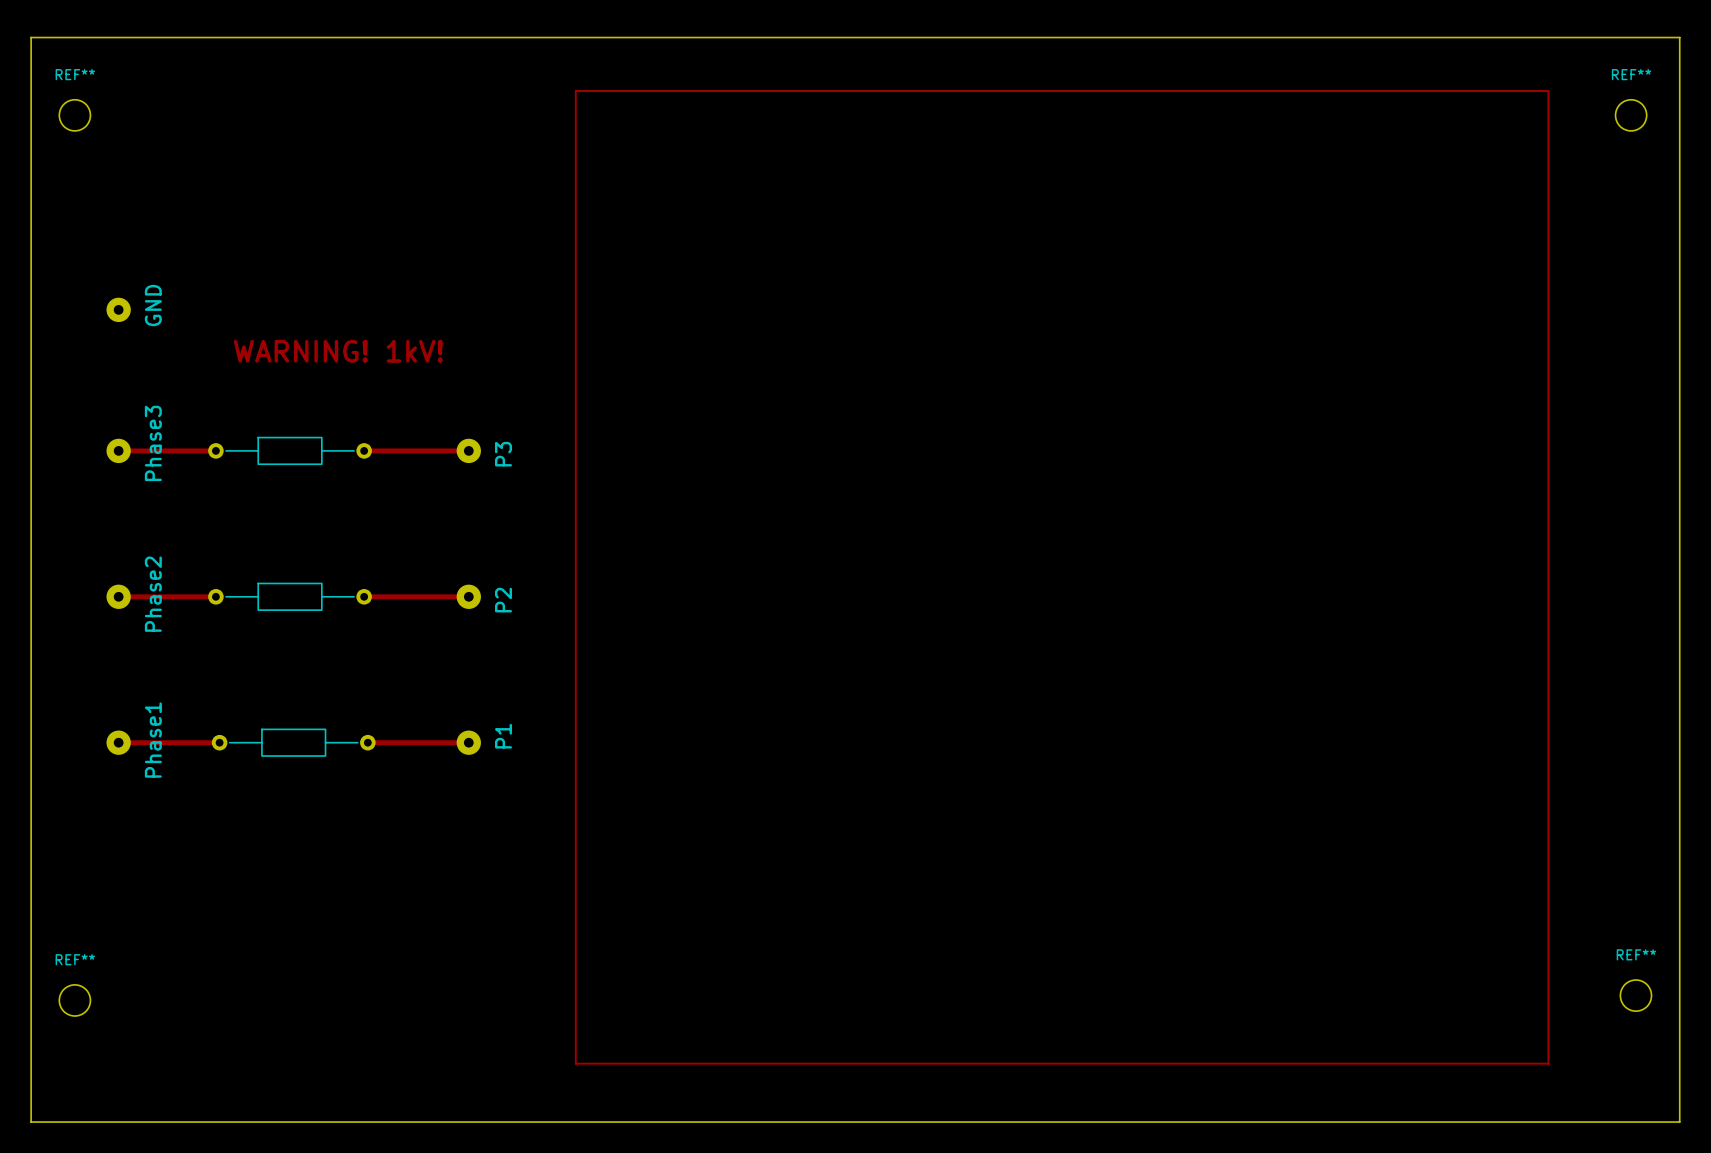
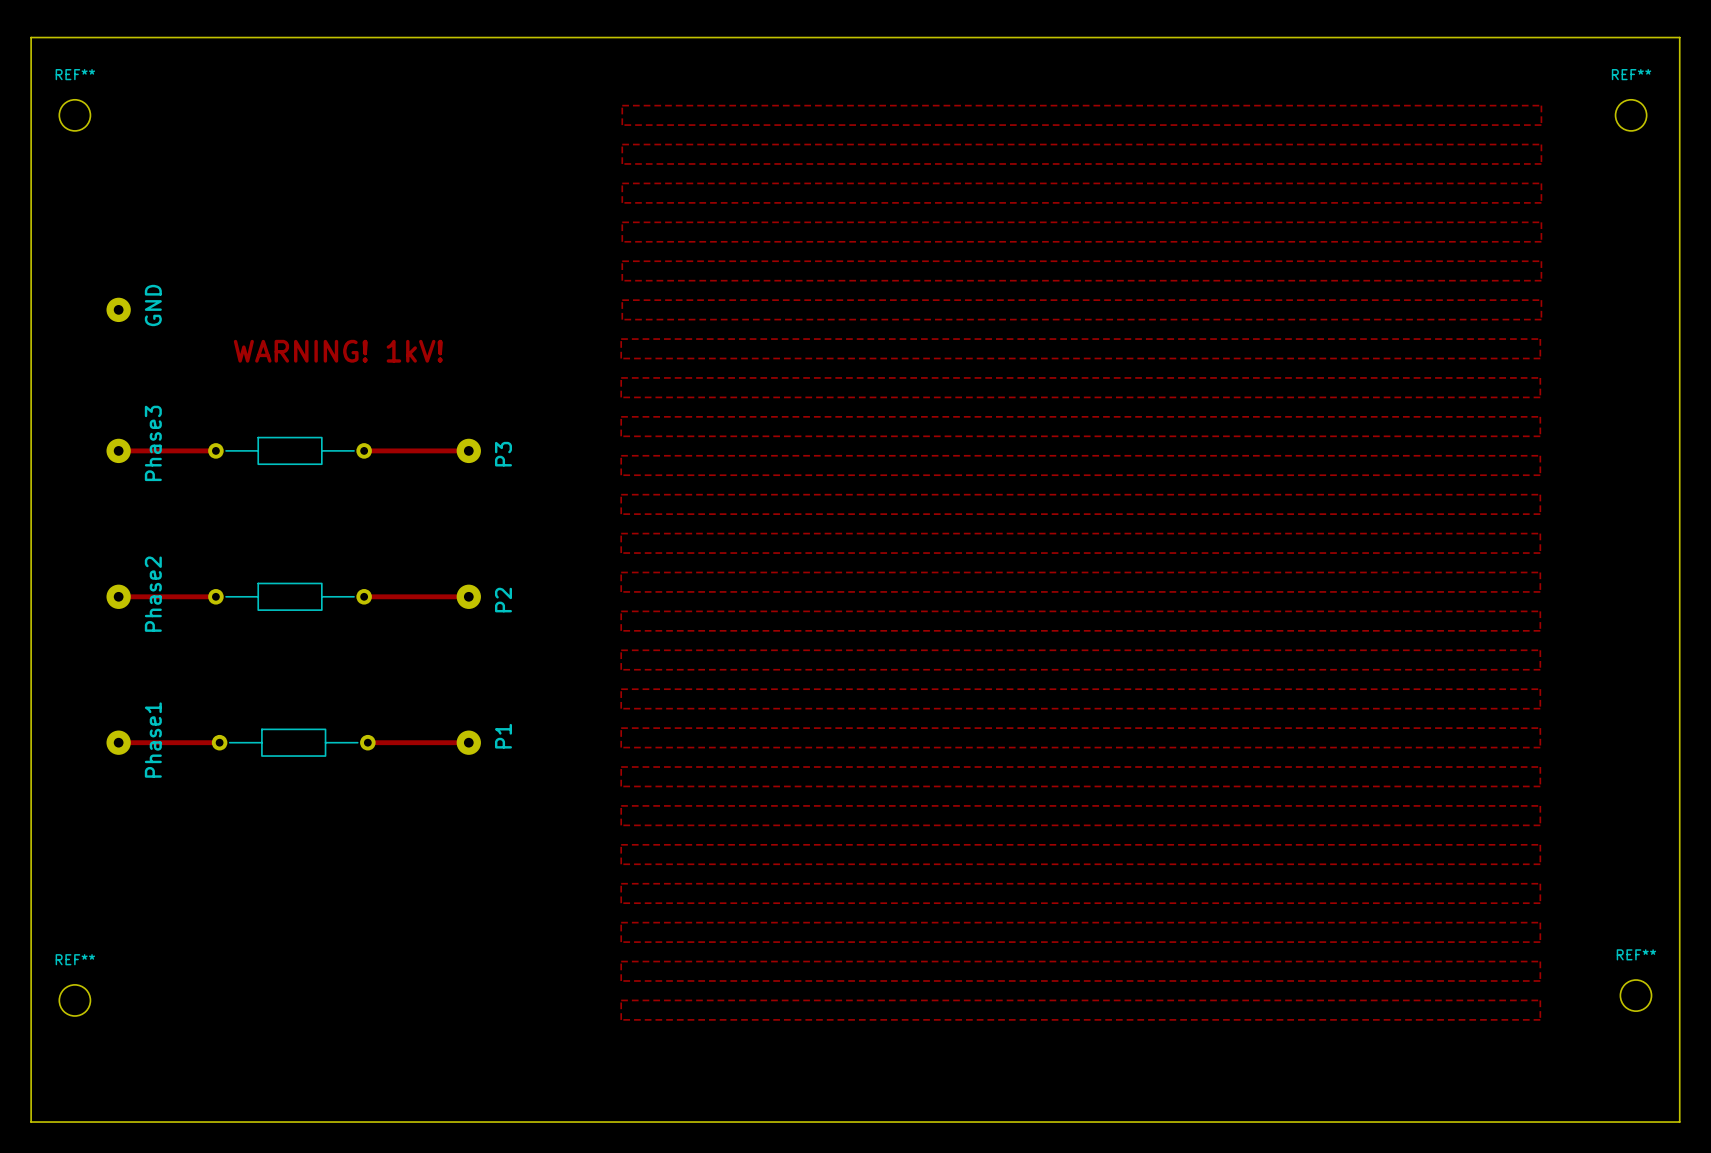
top track: (575, 91) (1548, 91) (1548, 1063) (575, 1063) (575, 91) -> none
top zone outline: none -> (622, 105) (622, 125) (1541, 125) (1541, 105) (622, 105)
top zone outline: none -> (622, 144) (622, 163) (1541, 163) (1541, 144) (622, 144)
top zone outline: none -> (622, 183) (622, 202) (1541, 202) (1541, 183) (622, 183)
top zone outline: none -> (622, 222) (622, 241) (1541, 241) (1541, 222) (622, 222)
top zone outline: none -> (622, 261) (622, 280) (1541, 280) (1541, 261) (622, 261)
top zone outline: none -> (622, 300) (1541, 300) (1541, 319) (622, 319) (622, 300)
top zone outline: none -> (621, 339) (621, 358) (1540, 358) (1540, 339) (621, 339)
top zone outline: none -> (621, 377) (621, 397) (1540, 397) (1540, 377) (621, 377)
top zone outline: none -> (621, 416) (621, 436) (1540, 436) (1540, 416) (621, 416)
top zone outline: none -> (621, 455) (621, 475) (1540, 475) (1540, 455) (621, 455)
top zone outline: none -> (621, 494) (621, 514) (1540, 514) (1540, 494) (621, 494)
top zone outline: none -> (621, 533) (621, 553) (1540, 553) (1540, 533) (621, 533)
top zone outline: none -> (621, 572) (621, 591) (1540, 591) (1540, 572) (621, 572)
top zone outline: none -> (621, 611) (1540, 611) (1540, 630) (621, 630) (621, 611)
top zone outline: none -> (621, 650) (621, 669) (1540, 669) (1540, 650) (621, 650)
top zone outline: none -> (621, 689) (621, 708) (1540, 708) (1540, 689) (621, 689)
top zone outline: none -> (621, 728) (621, 747) (1540, 747) (1540, 728) (621, 728)
top zone outline: none -> (621, 767) (621, 786) (1540, 786) (1540, 767) (621, 767)
top zone outline: none -> (621, 805) (621, 825) (1540, 825) (1540, 805) (621, 805)
top zone outline: none -> (621, 844) (621, 864) (1540, 864) (1540, 844) (621, 844)
top zone outline: none -> (621, 883) (621, 903) (1540, 903) (1540, 883) (621, 883)
top zone outline: none -> (621, 922) (621, 942) (1540, 942) (1540, 922) (621, 922)
top zone outline: none -> (621, 961) (621, 980) (1540, 980) (1540, 961) (621, 961)
top zone outline: none -> (621, 1000) (621, 1019) (1540, 1019) (1540, 1000) (621, 1000)

